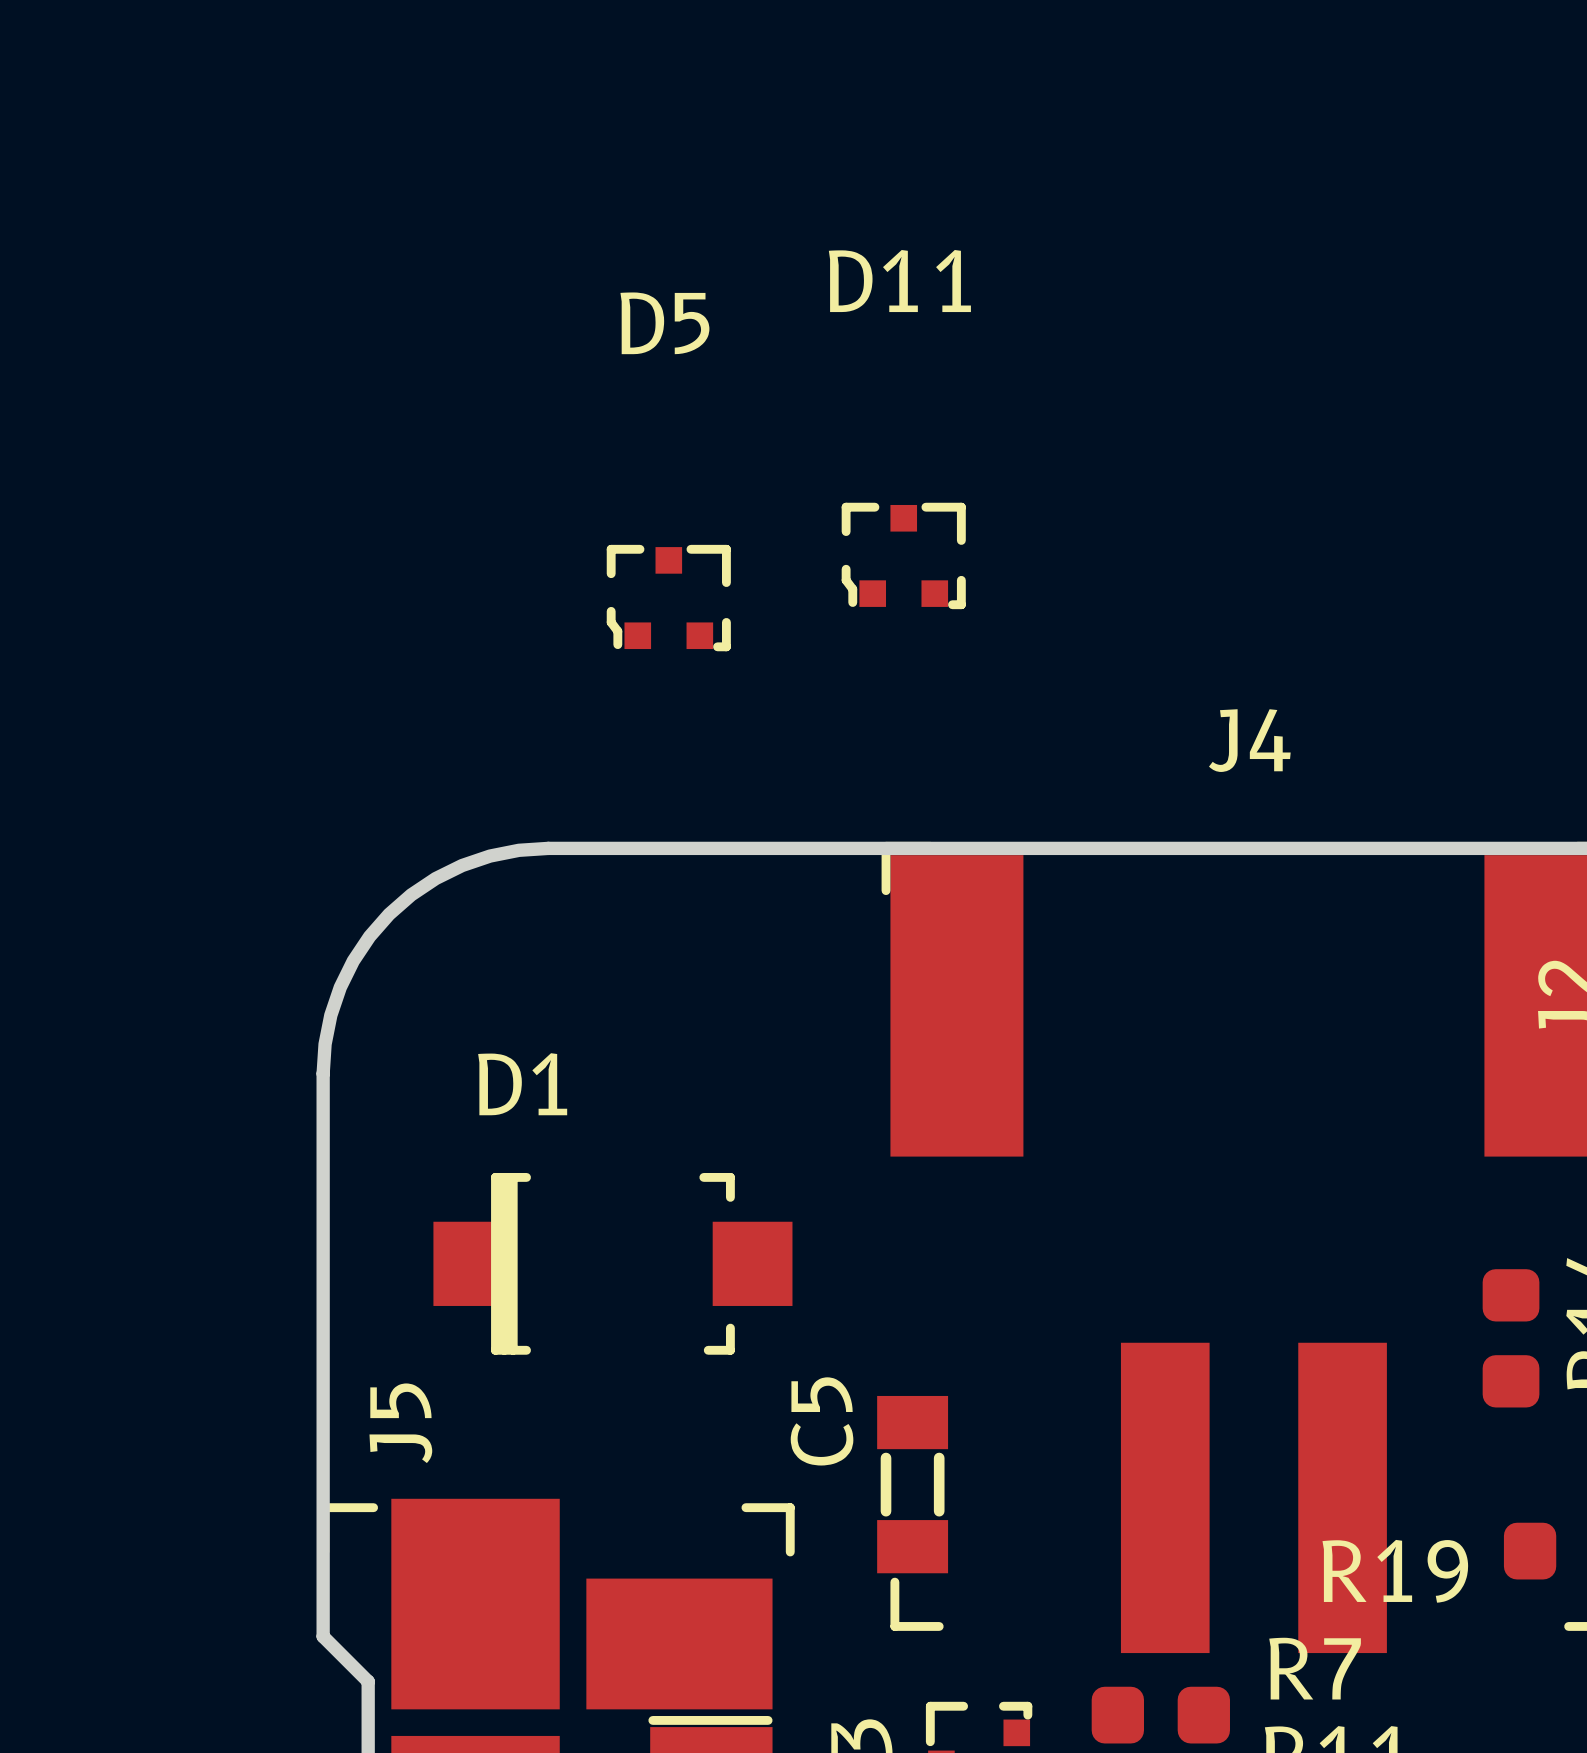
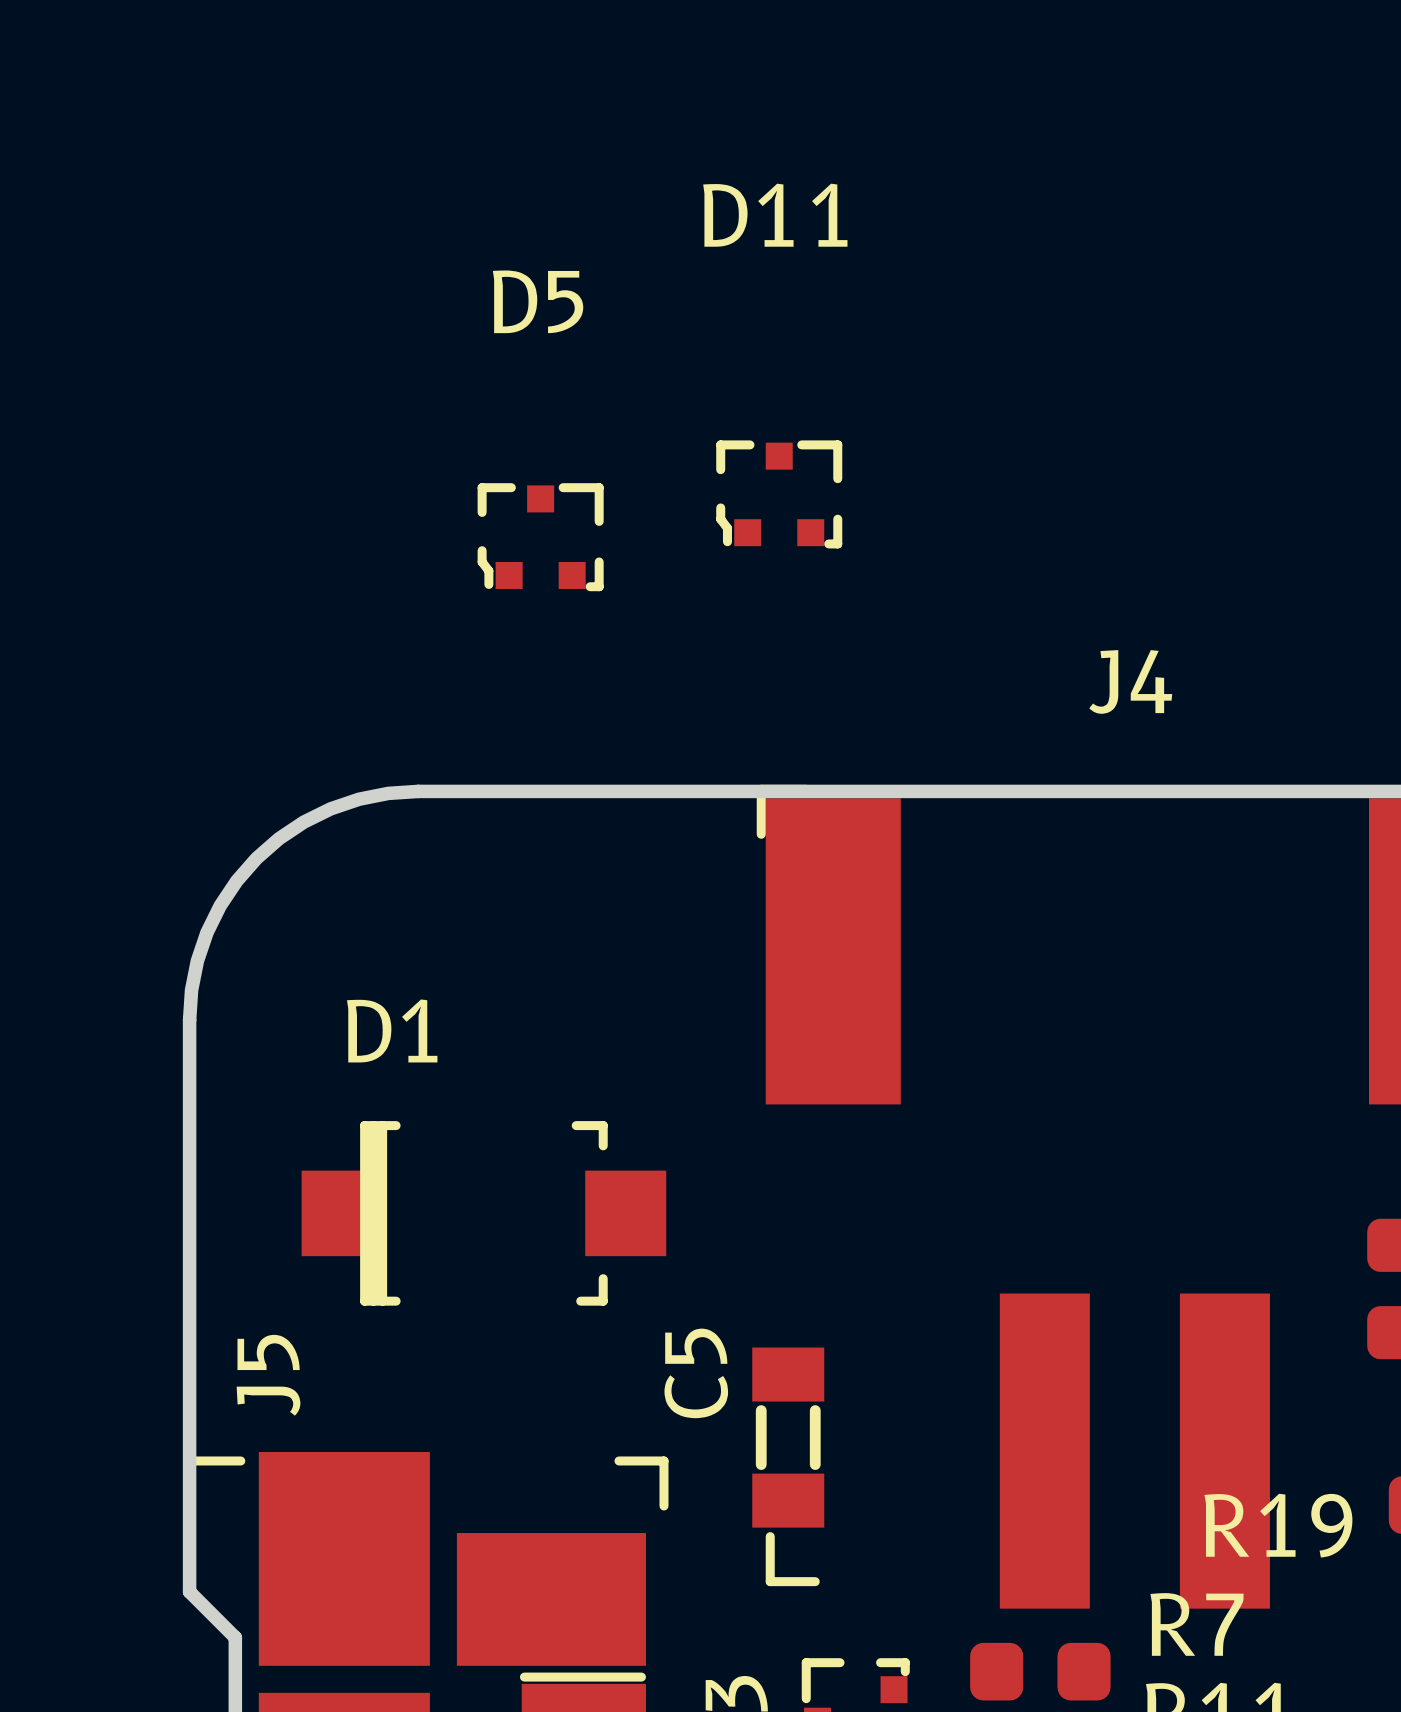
D5 name position: D5 (664, 323) -> D5 (538, 301)

